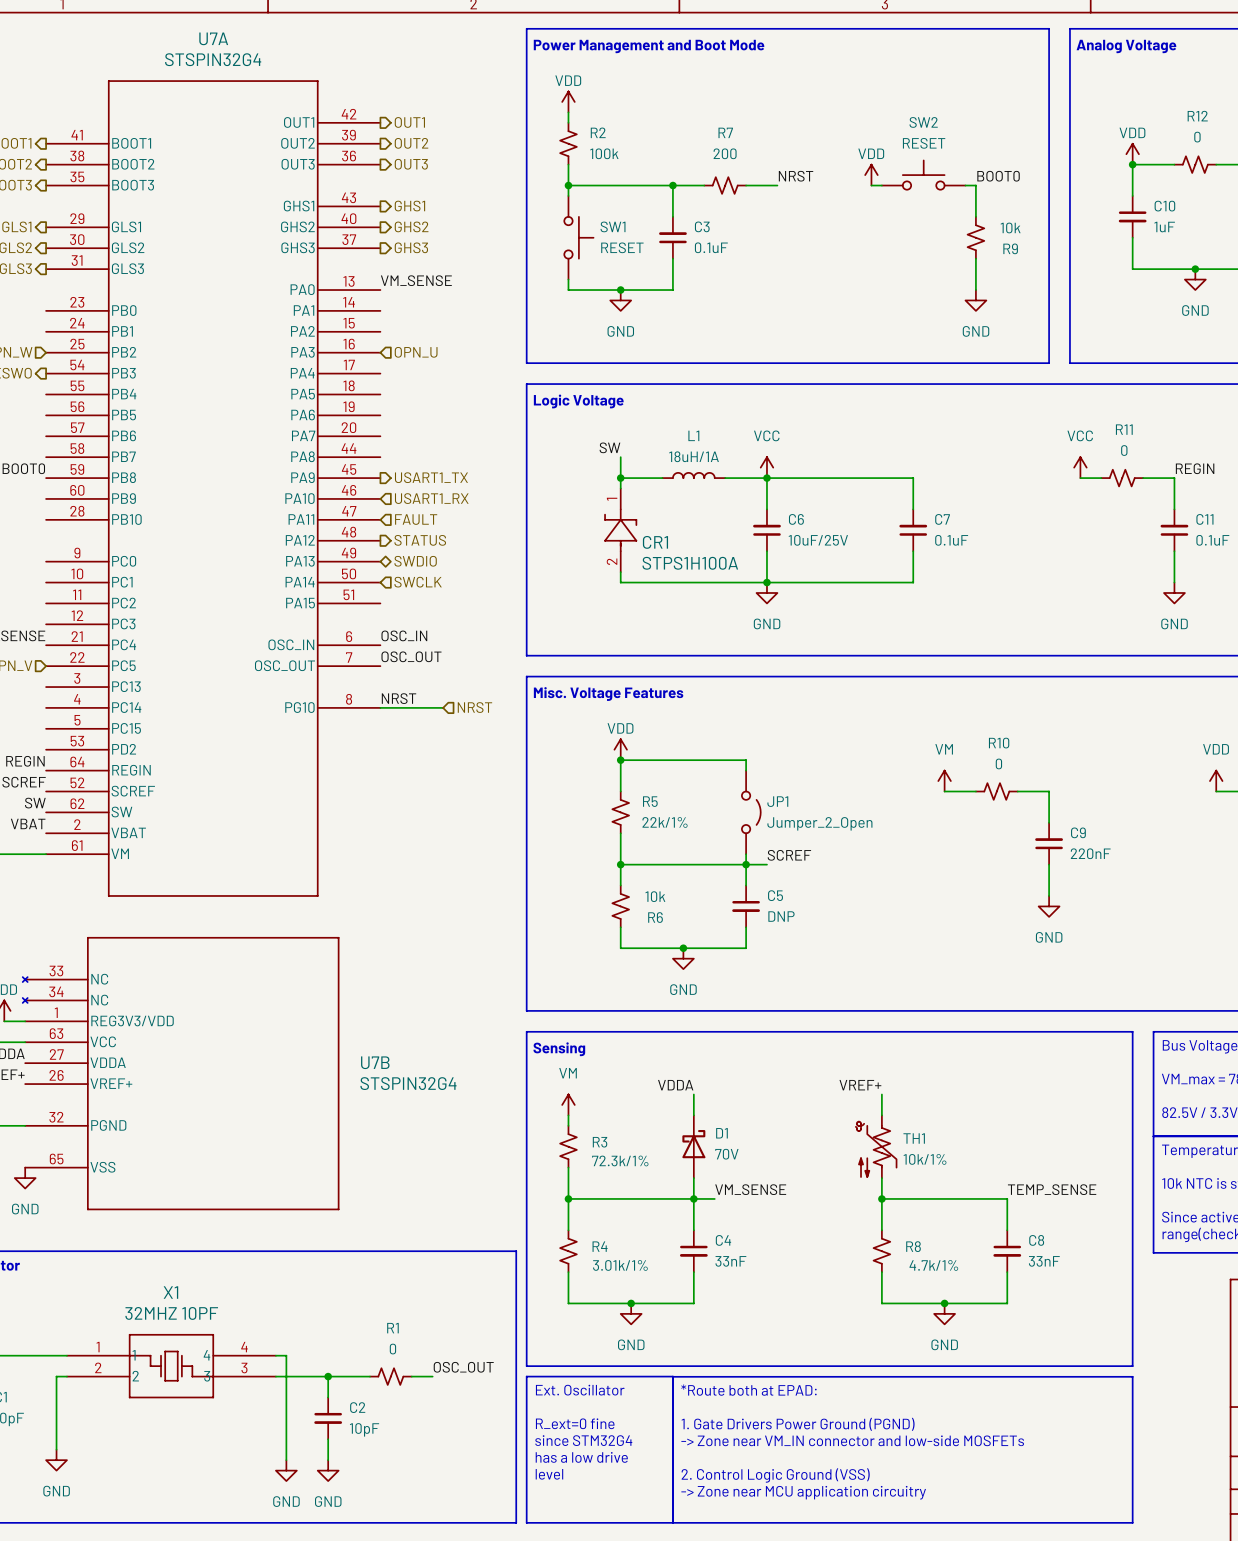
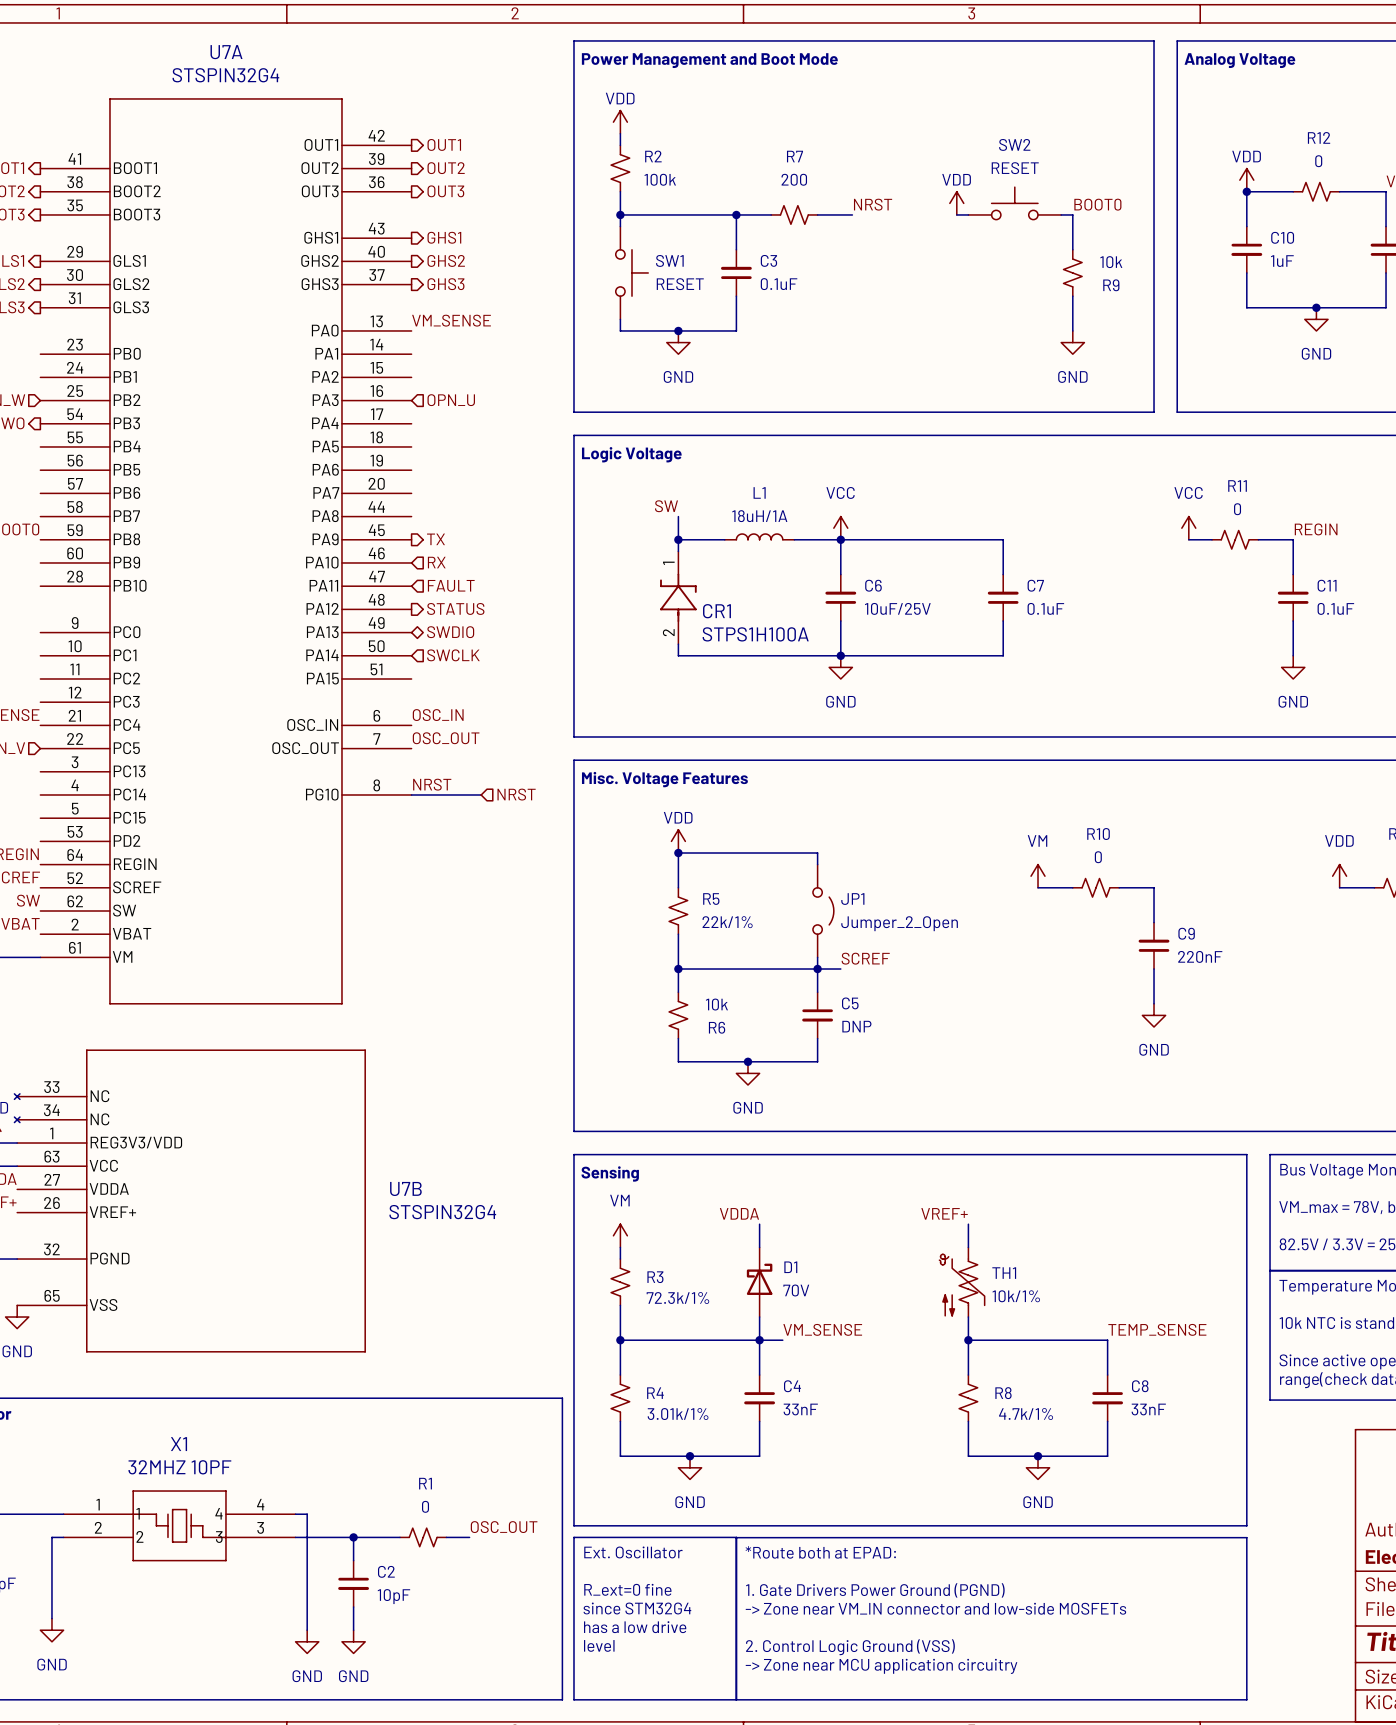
hierarchical label: USART1_TX (431, 477) -> TX (435, 539)
hierarchical label: USART1_RX (431, 498) -> RX (436, 562)

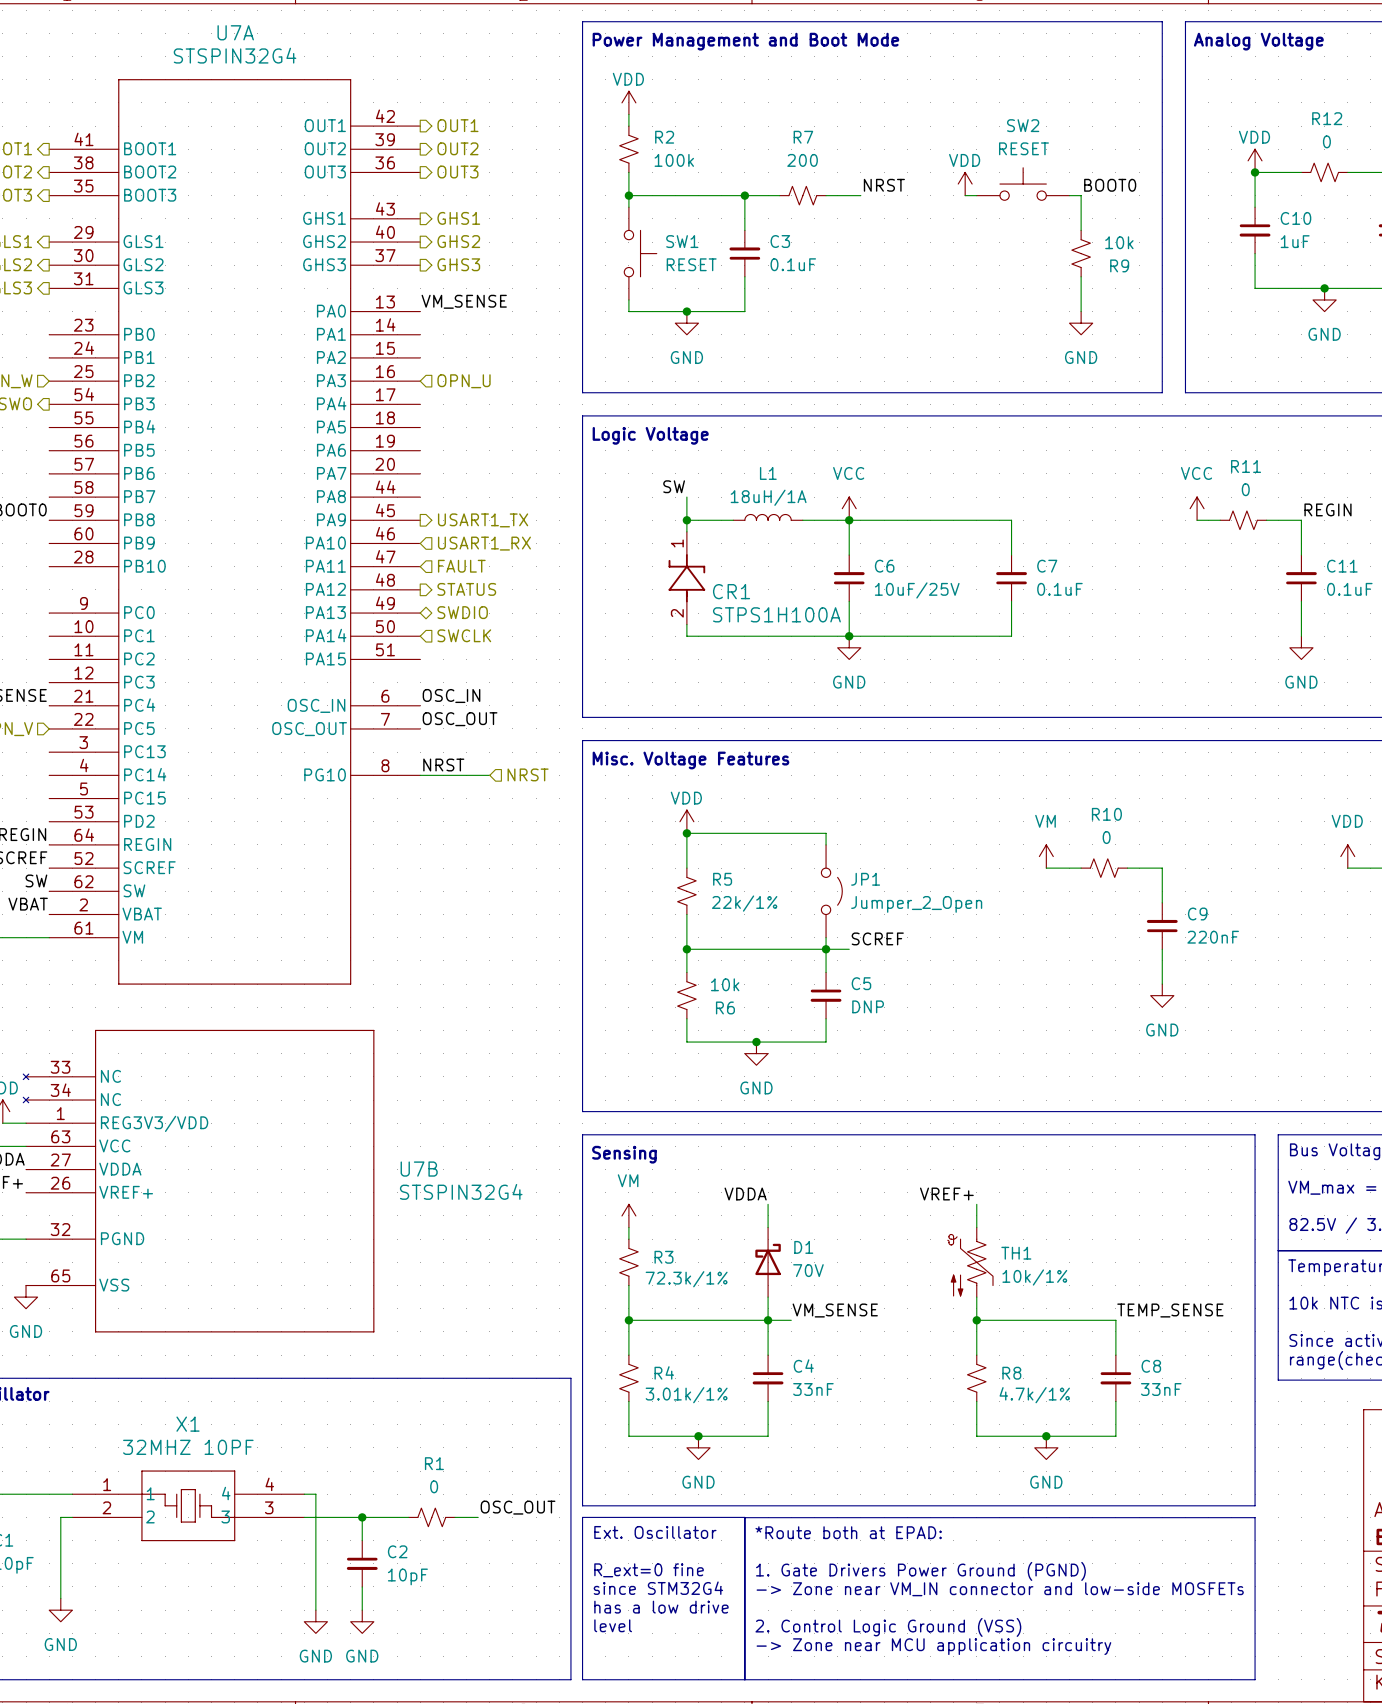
hierarchical label: TX (435, 539) -> USART1_TX (483, 520)
hierarchical label: RX (436, 562) -> USART1_RX (484, 543)

